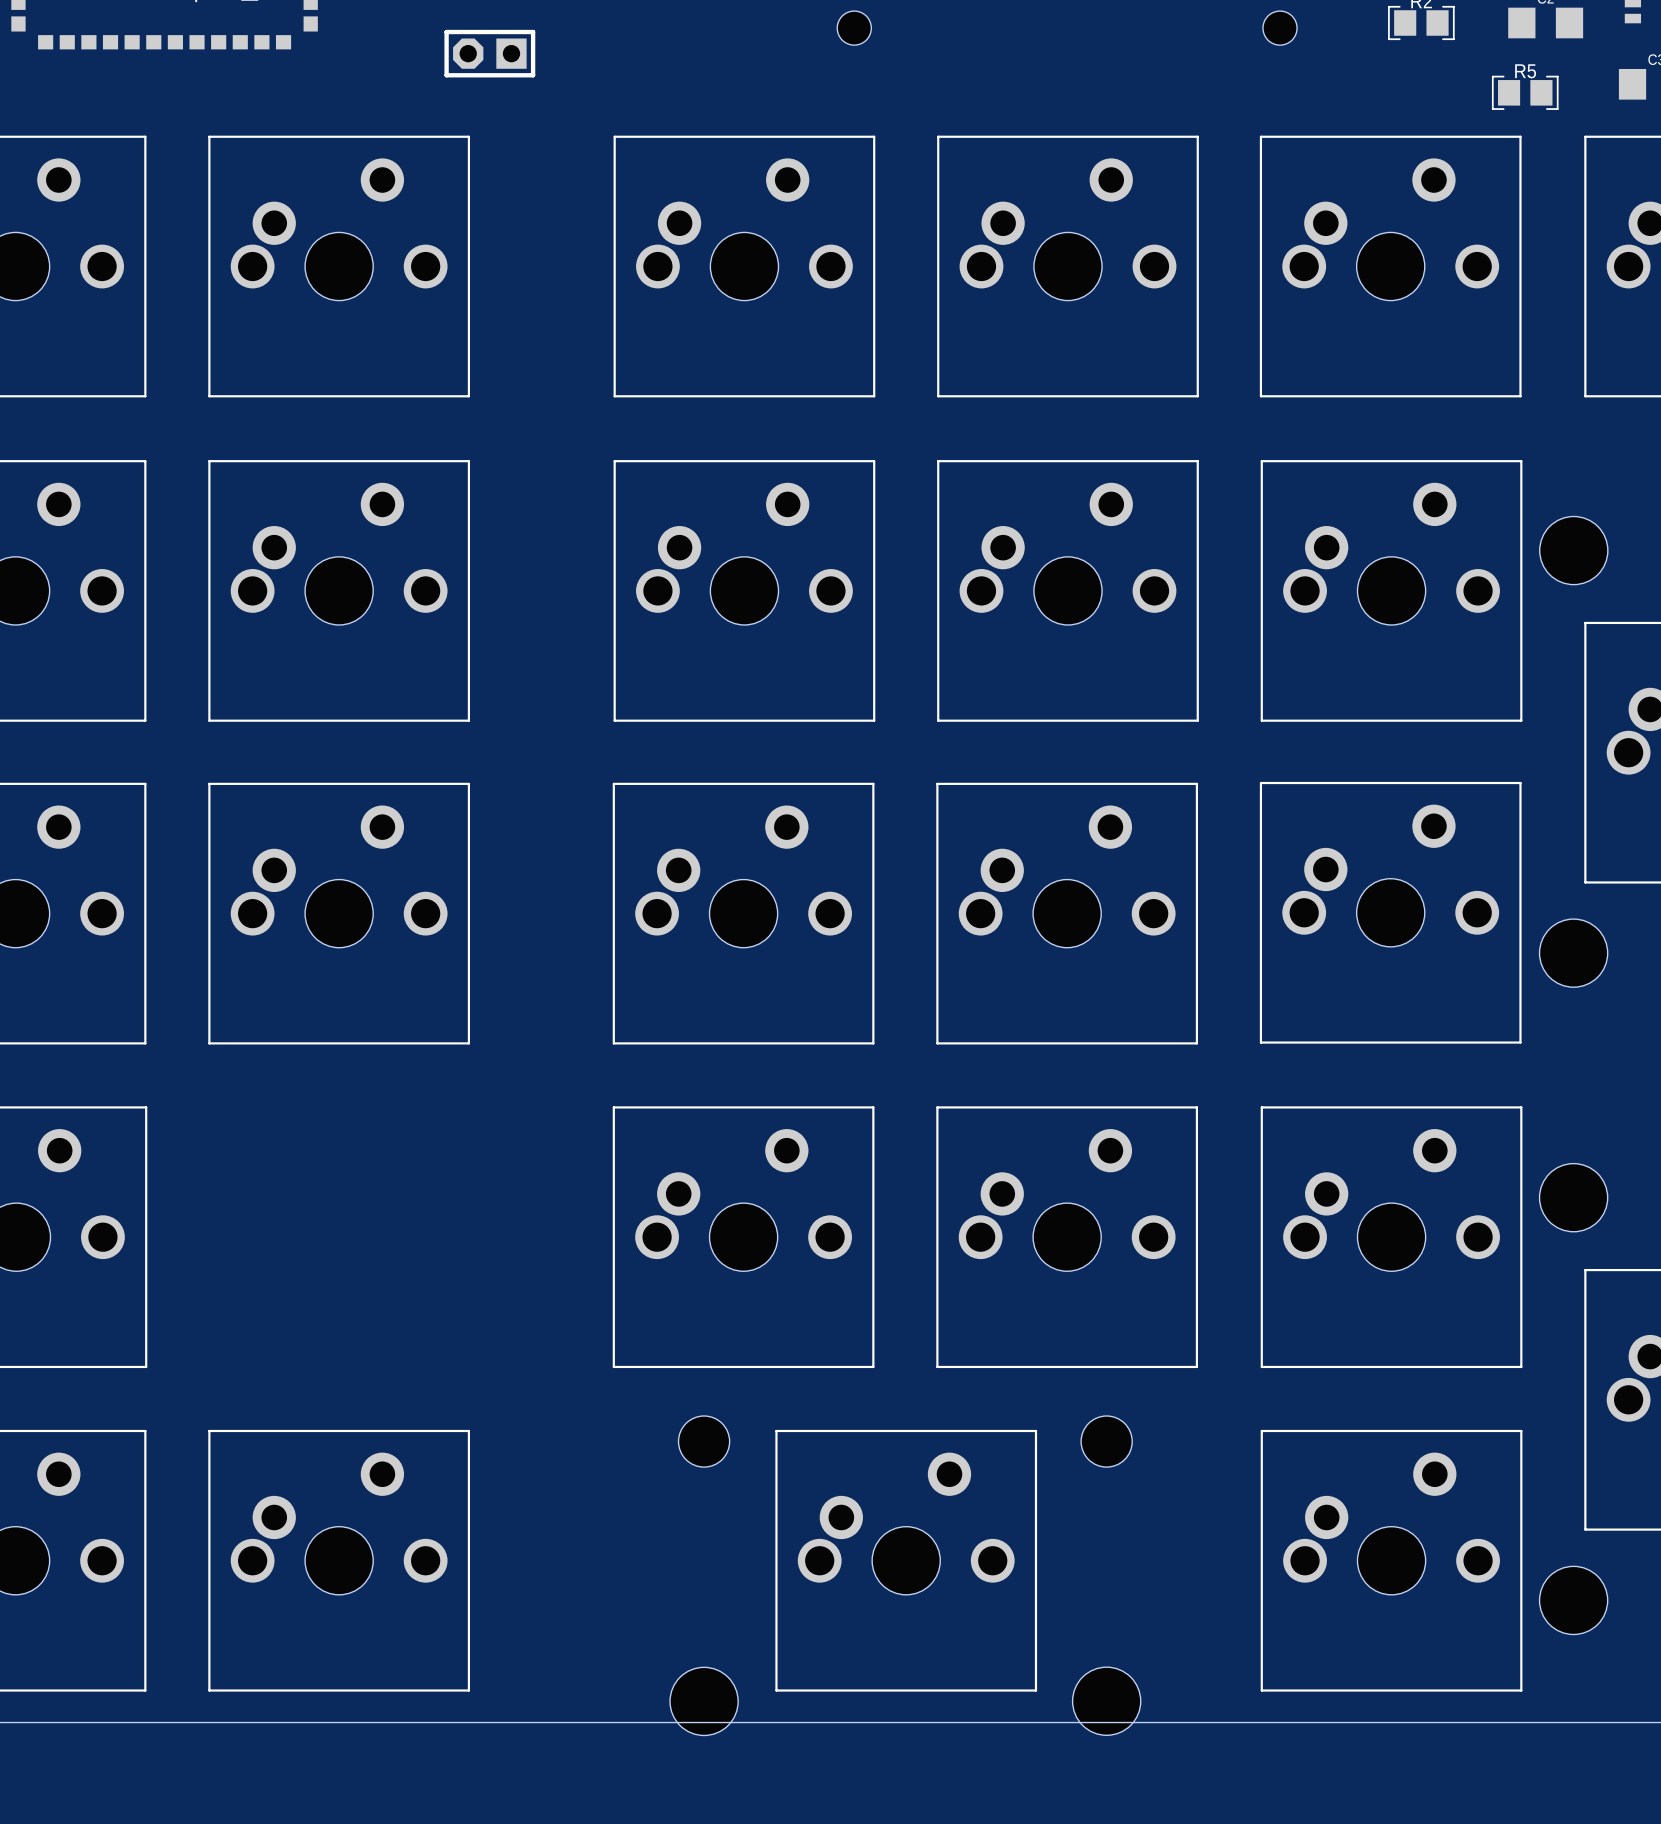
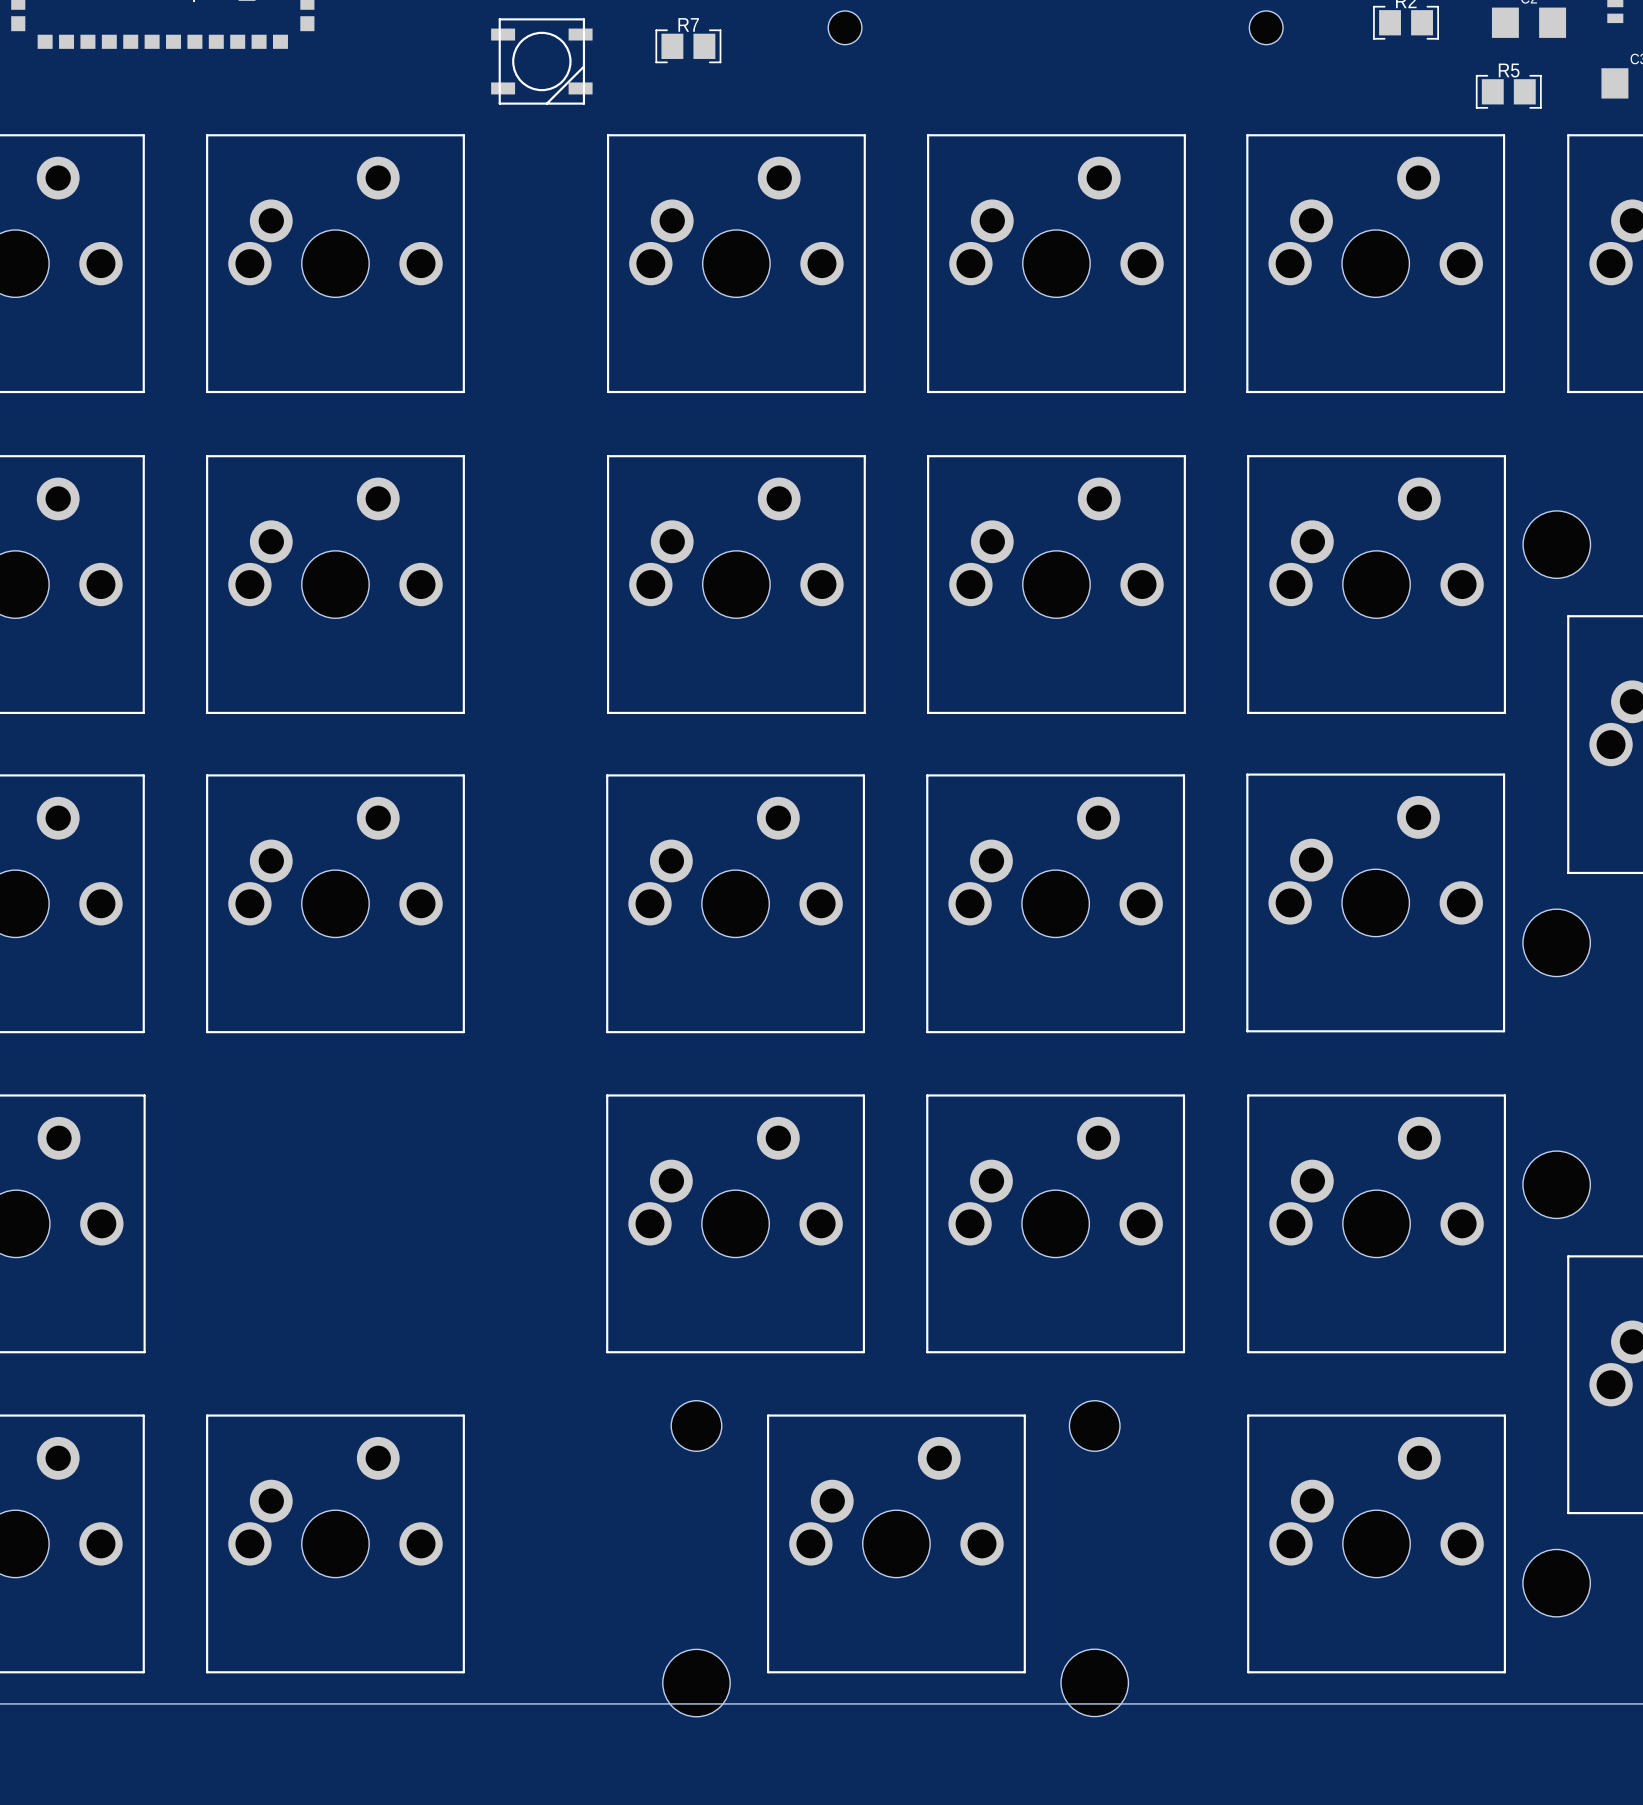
R7: none -> (688, 46)
part: (489, 53) -> none
part: none -> (541, 61)

